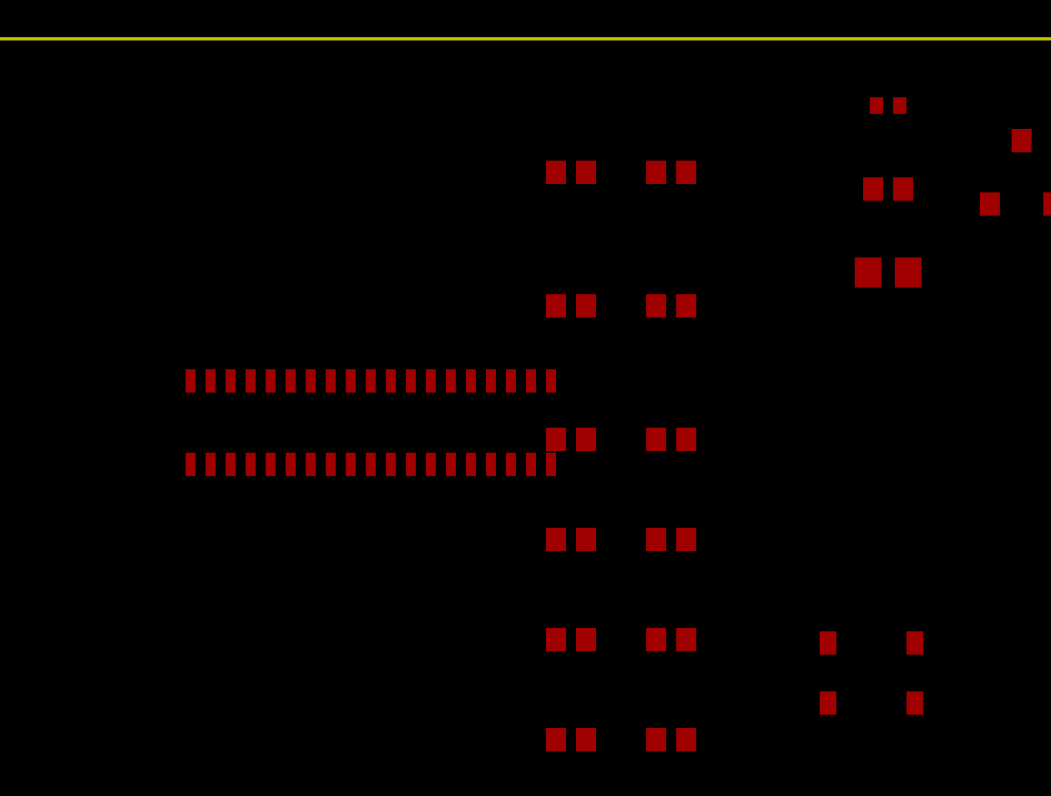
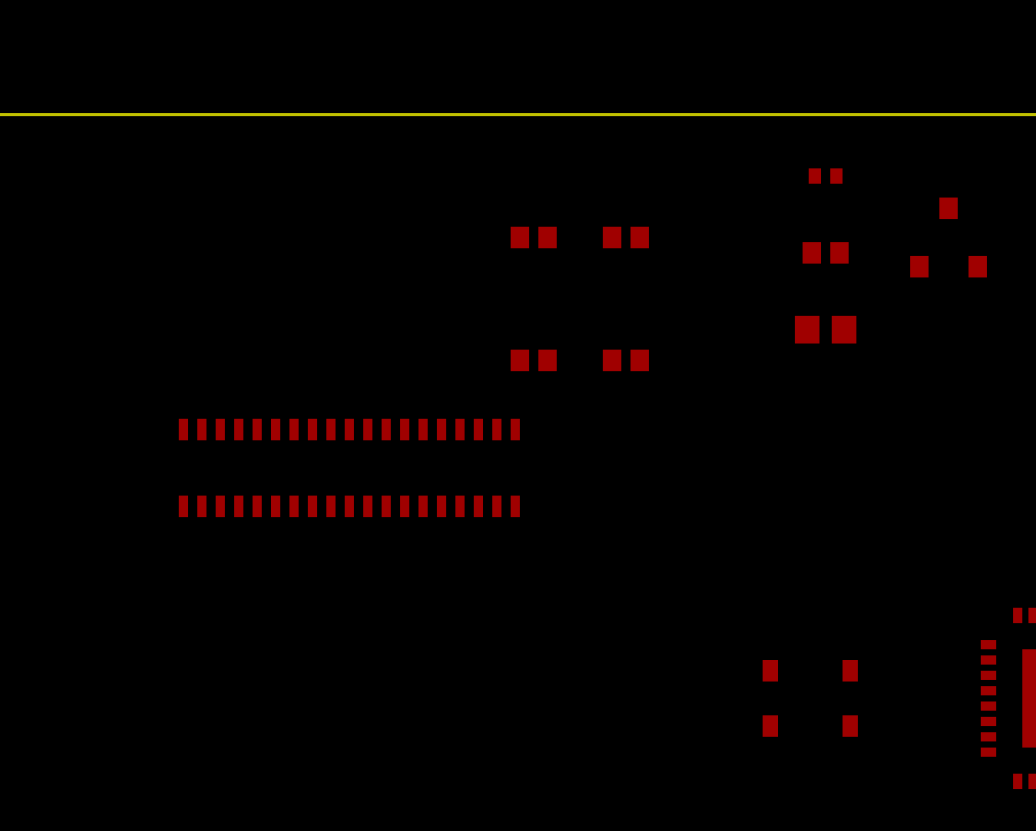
part: (571, 439) -> none
part: (671, 439) -> none
part: (571, 539) -> none
part: (671, 539) -> none
part: (571, 639) -> none
part: (671, 639) -> none
part: (571, 739) -> none
part: (671, 739) -> none

